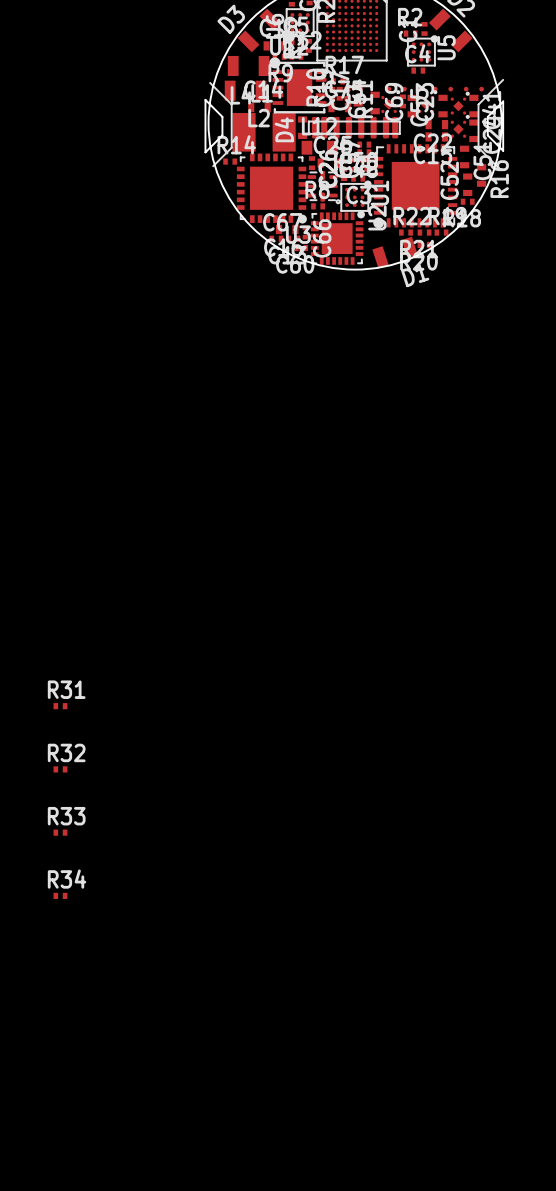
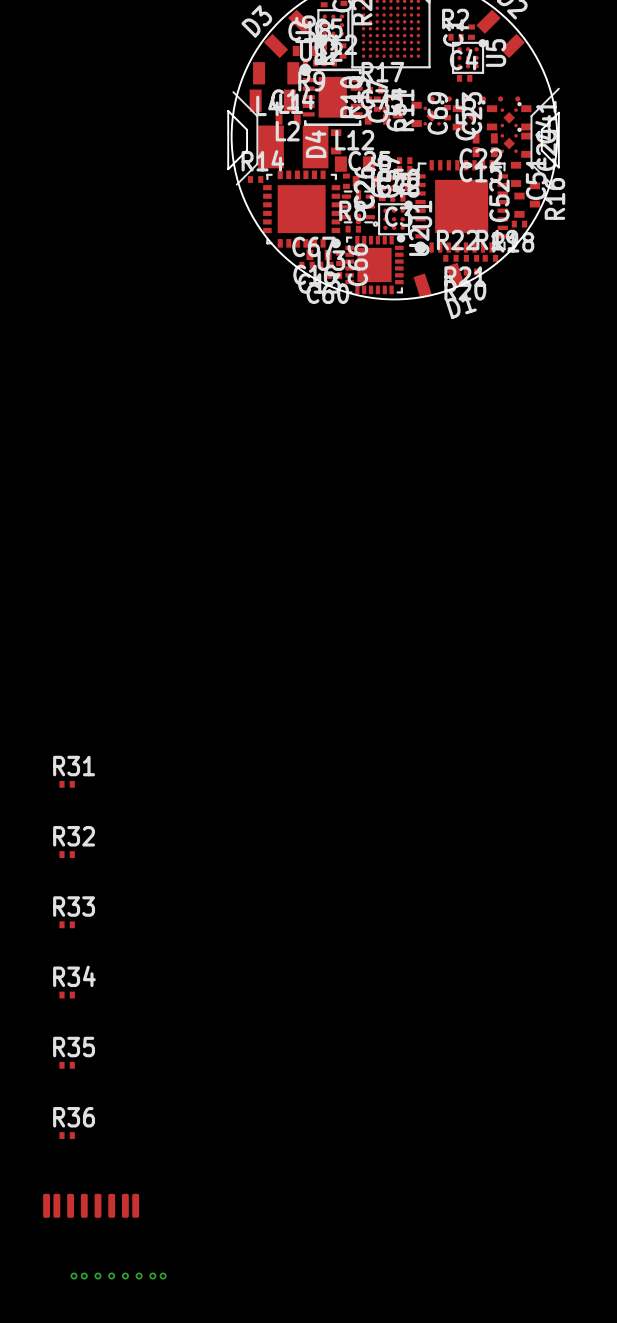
part: (481, 89) -> none
part: (354, 127) -> none
R35: none -> (67, 1065)
R36: none -> (67, 1135)
part: none -> (91, 1205)
part: none -> (118, 1276)

